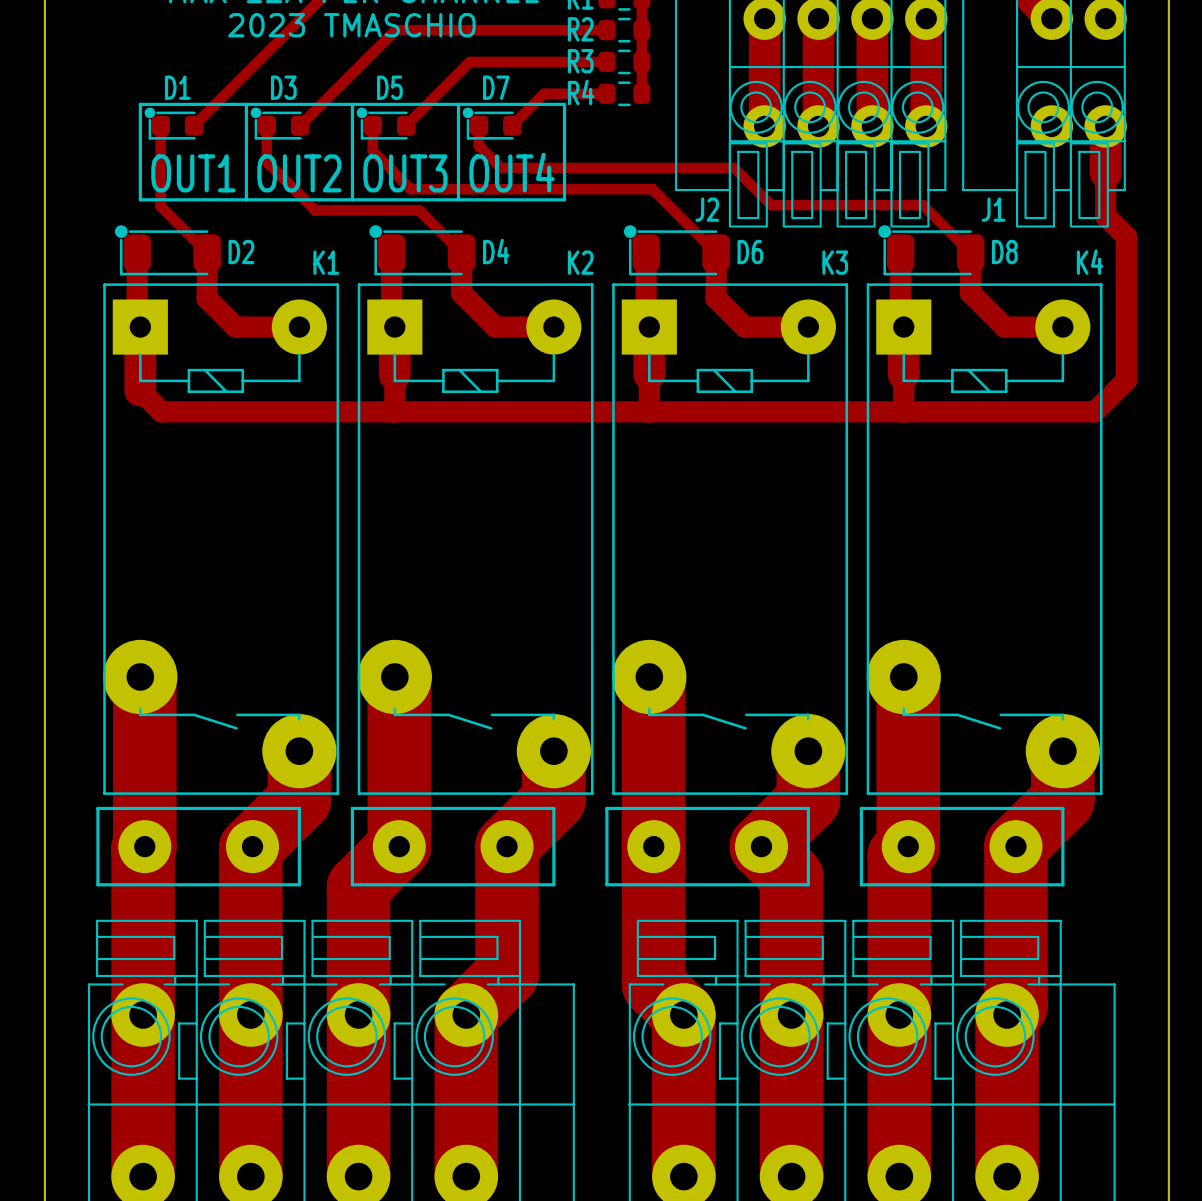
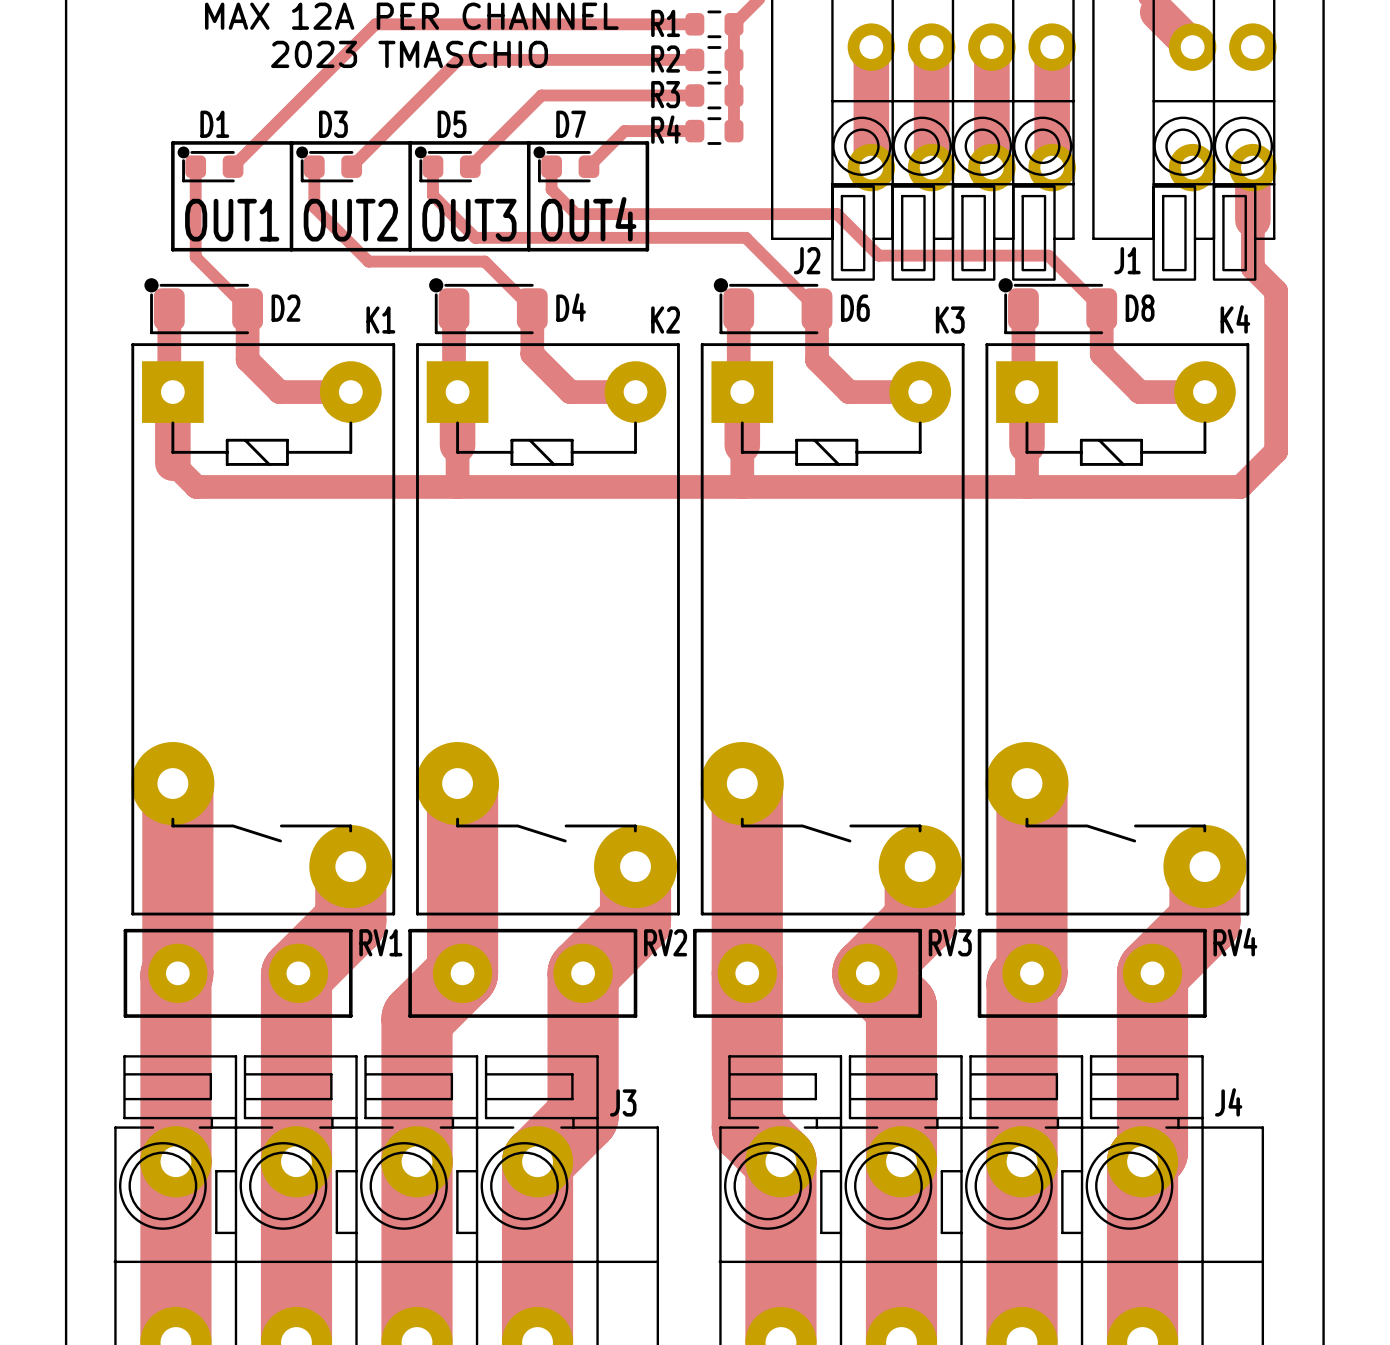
RV4 name: none -> RV4 (1235, 942)
RV1 name: none -> RV1 (380, 942)
RV2 name: none -> RV2 (665, 942)
RV3 name: none -> RV3 (950, 942)
J4 name: none -> J4 (1228, 1102)
J3 name: none -> J3 (623, 1102)

